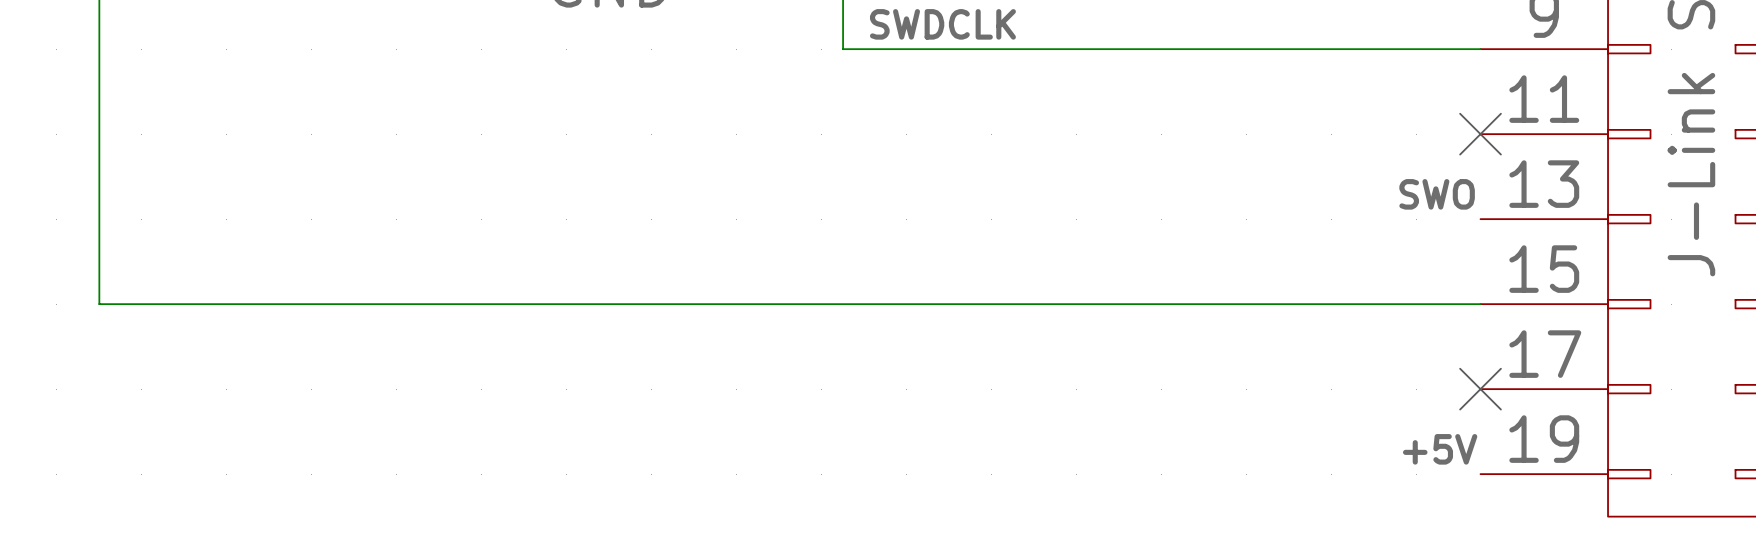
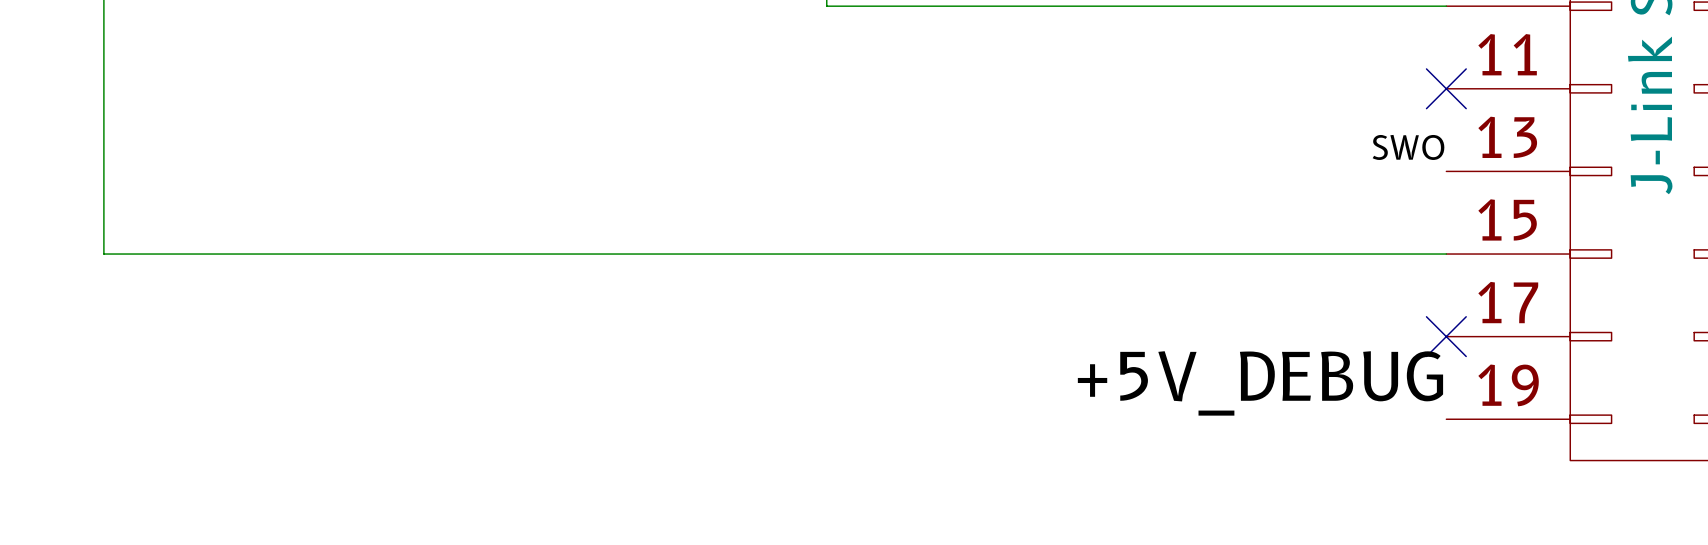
label: +5V (1440, 449) -> +5V_DEBUG (1260, 383)

